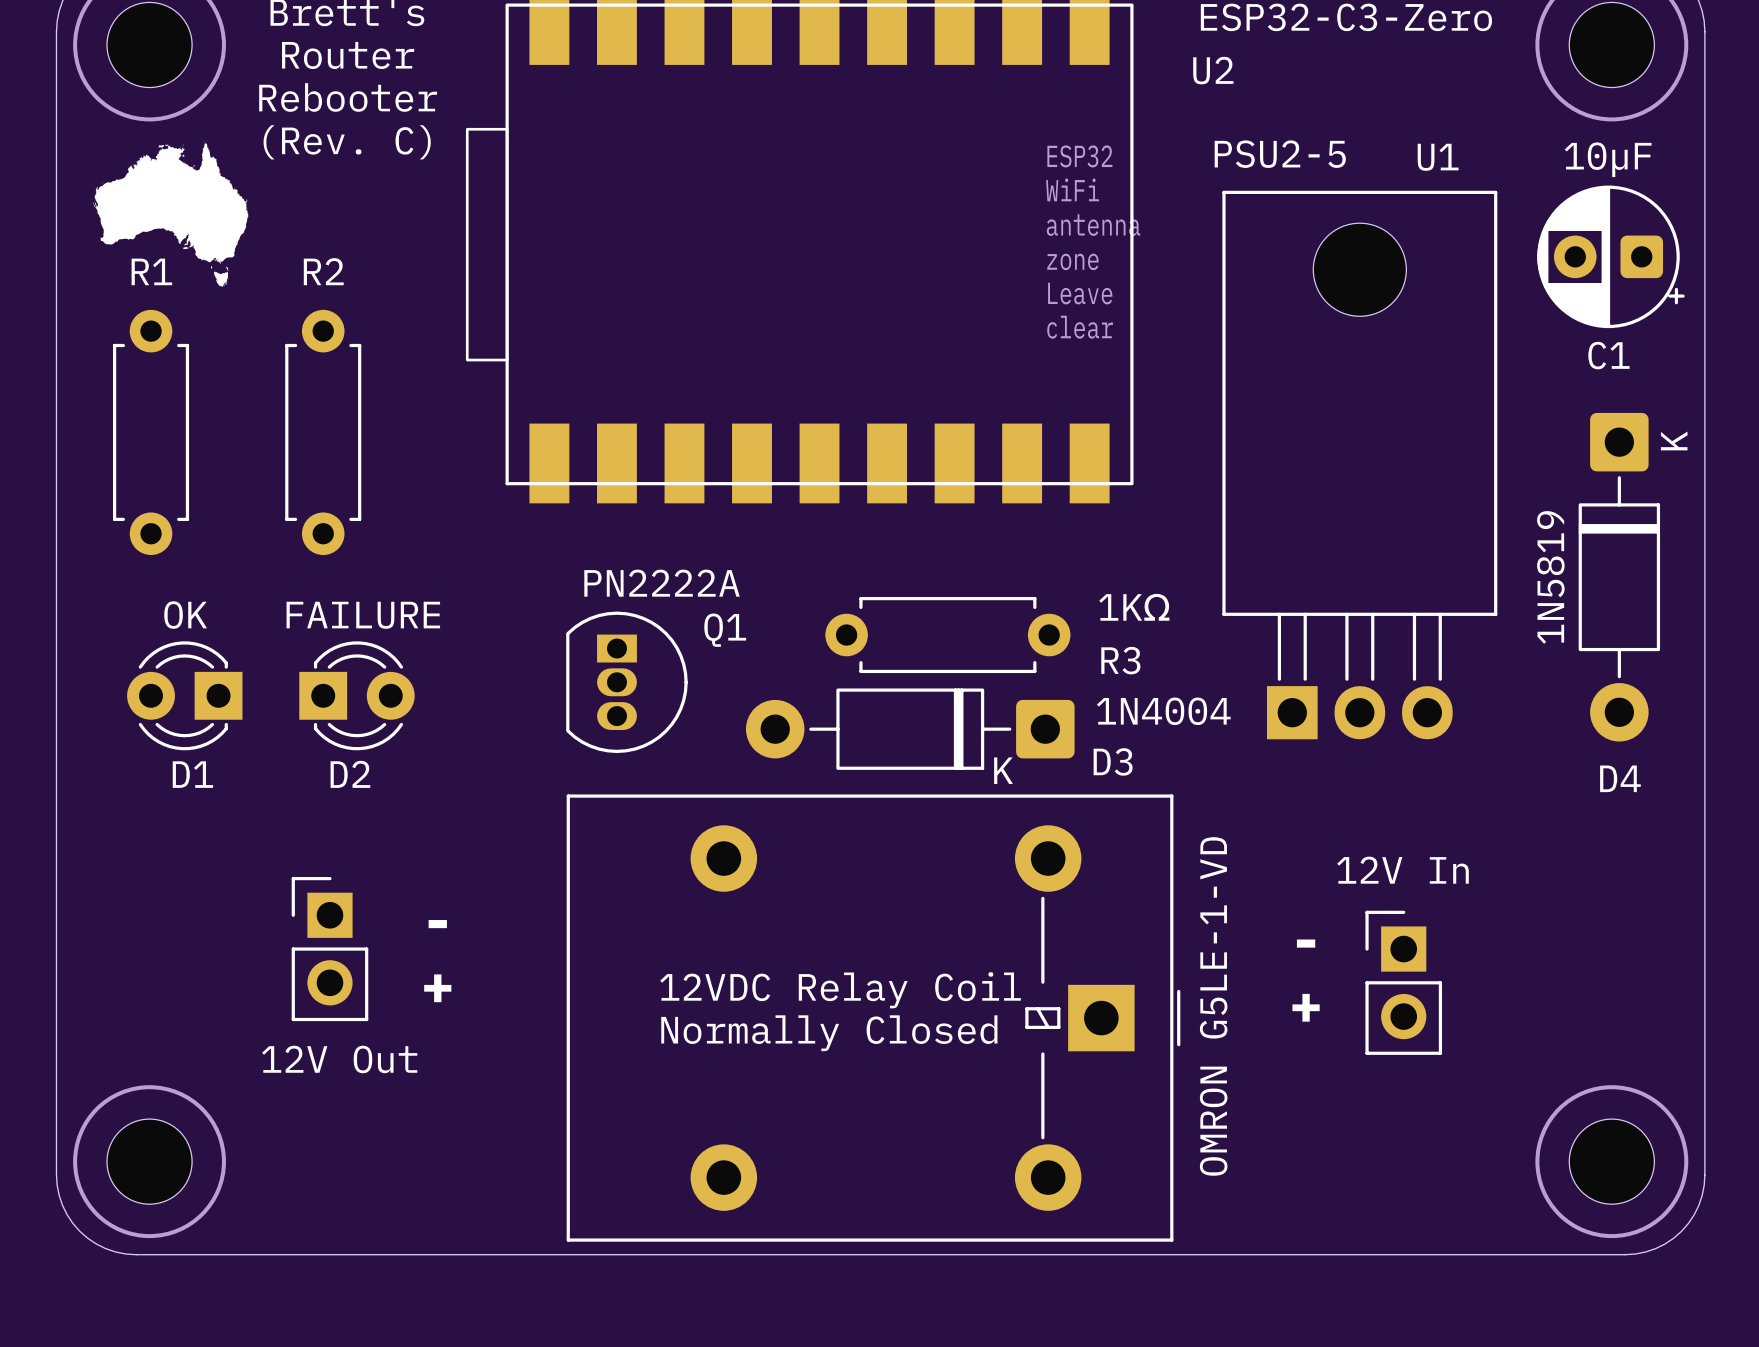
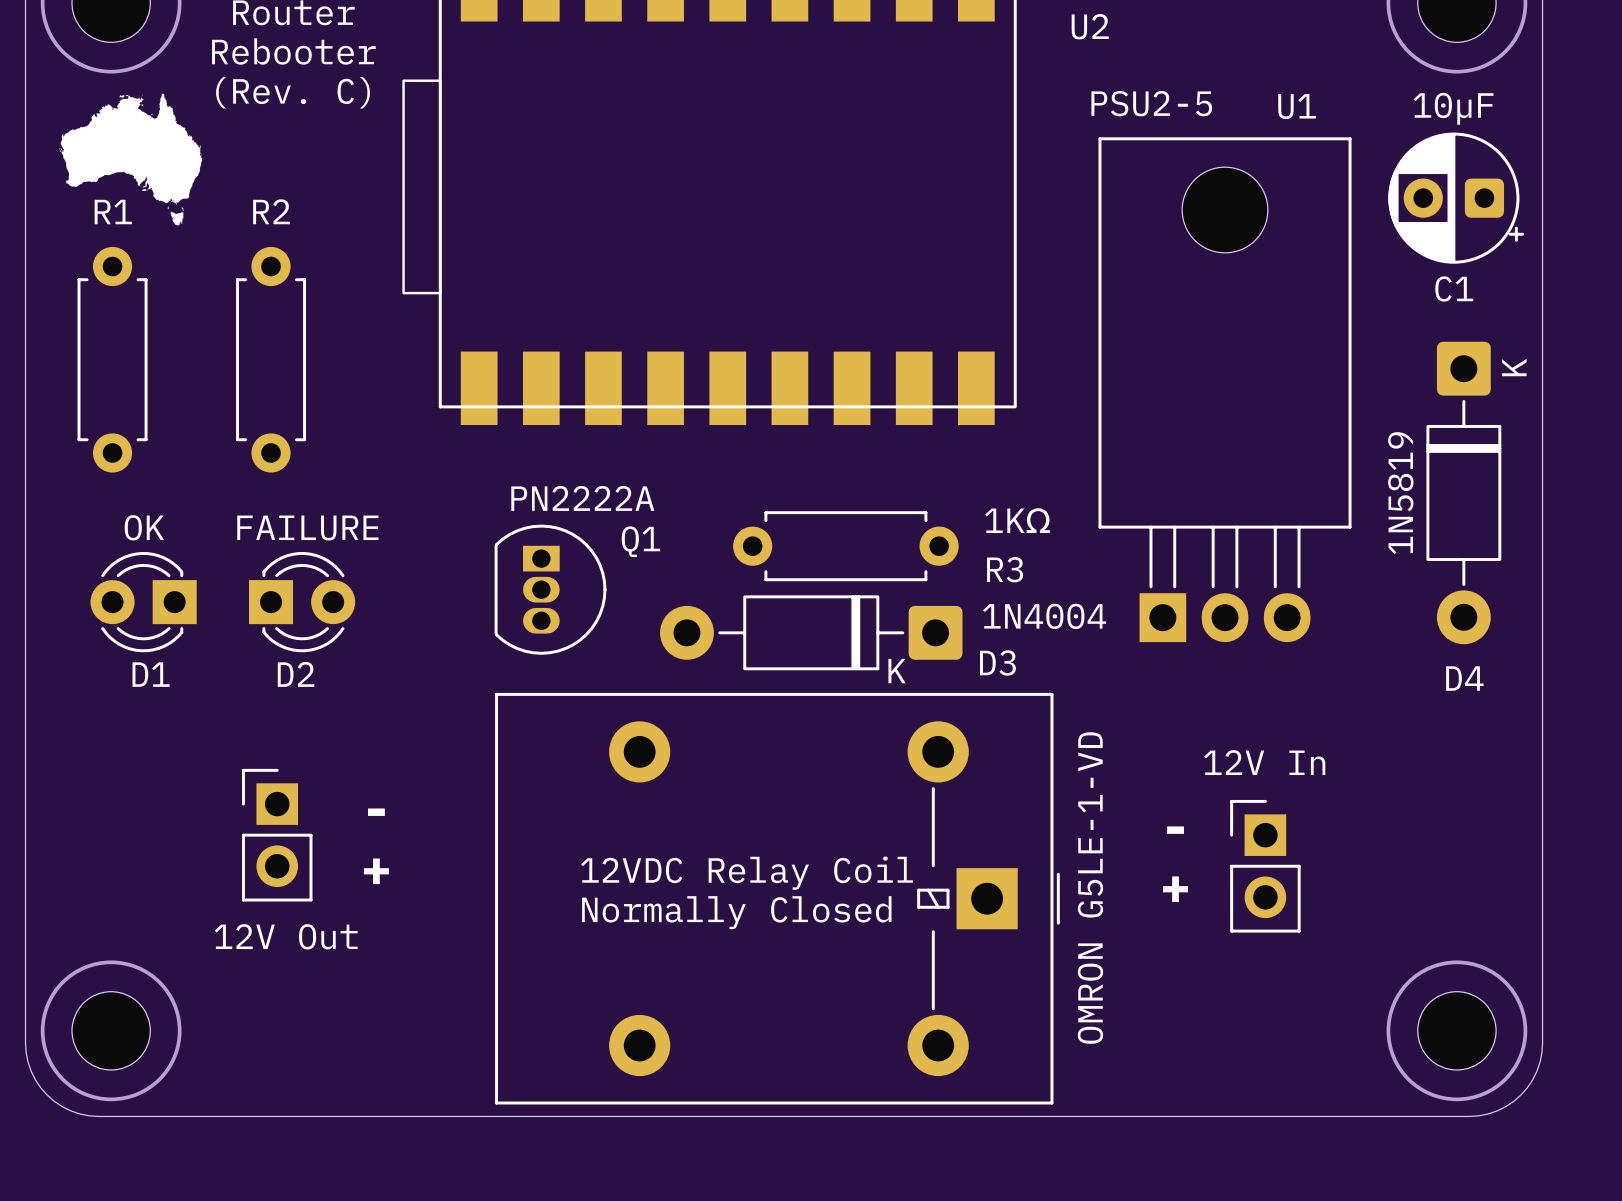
text: ESP32 (1079, 156) -> none
text: WiFi (1072, 189) -> none
text: antenna (1093, 225) -> none
text: zone (1072, 261) -> none
text: Leave (1080, 293) -> none
text: clear (1080, 327) -> none

